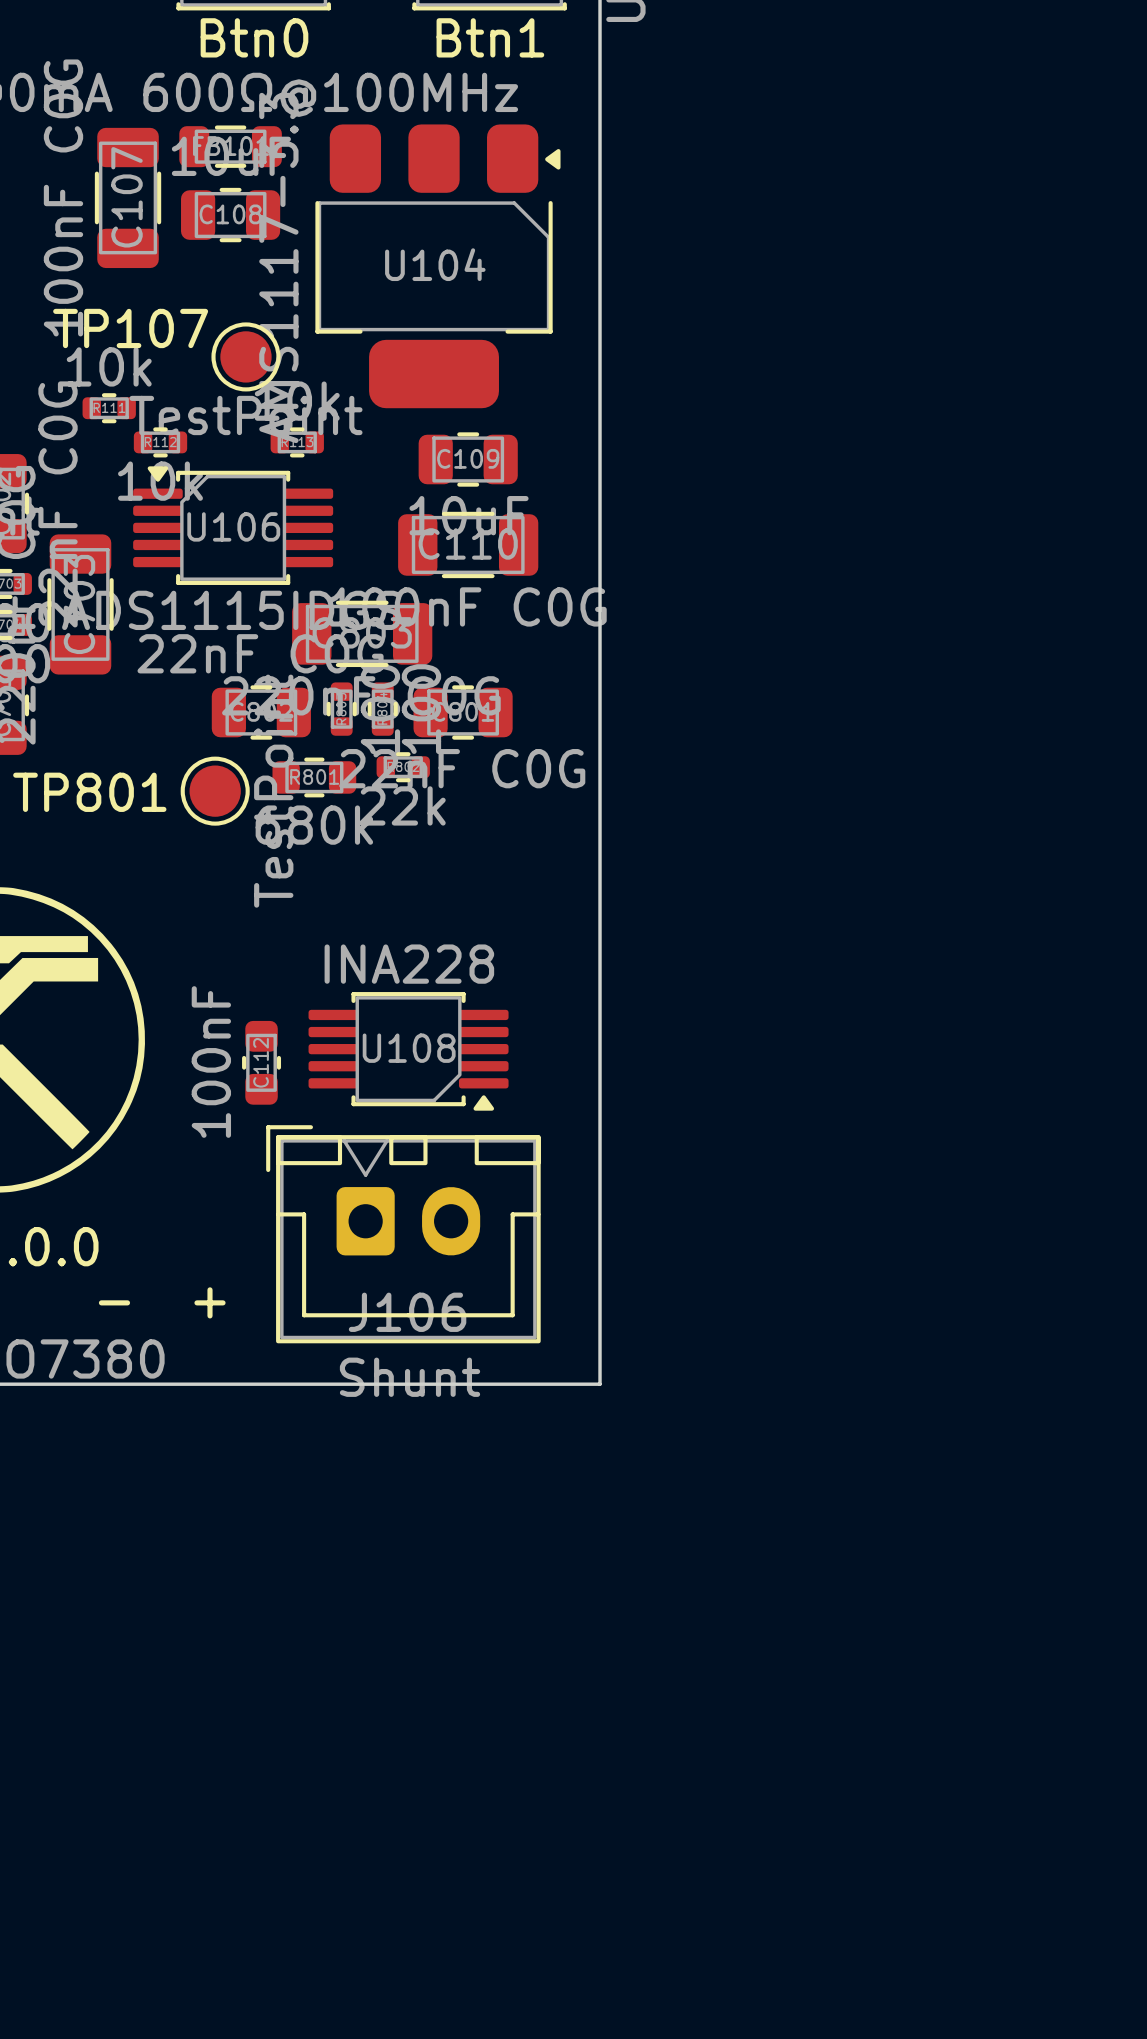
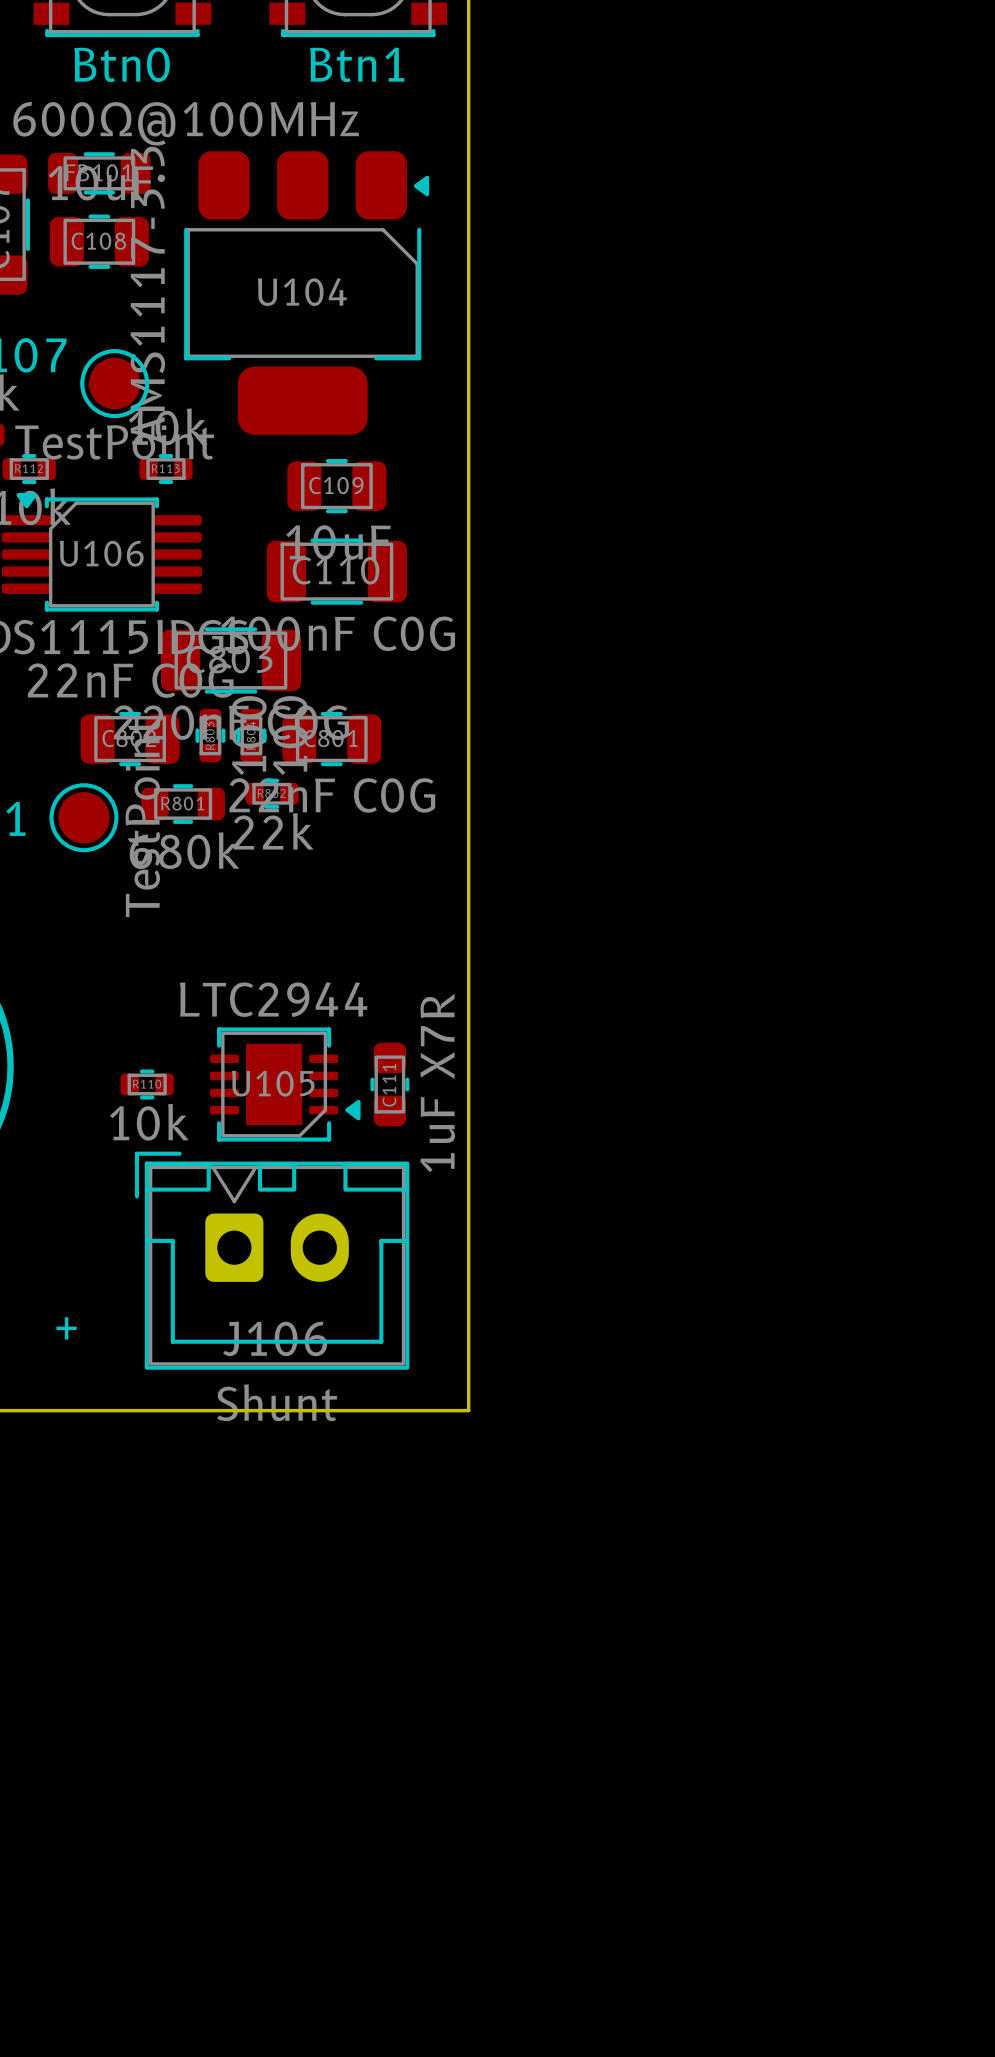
U108: INA228 (408, 1051) -> none
R110: none -> 10k (147, 1084)
U105: none -> LTC2944 (285, 1084)
C111: none -> 1uF X7R (389, 1084)
C112: 100nF (261, 1062) -> none

